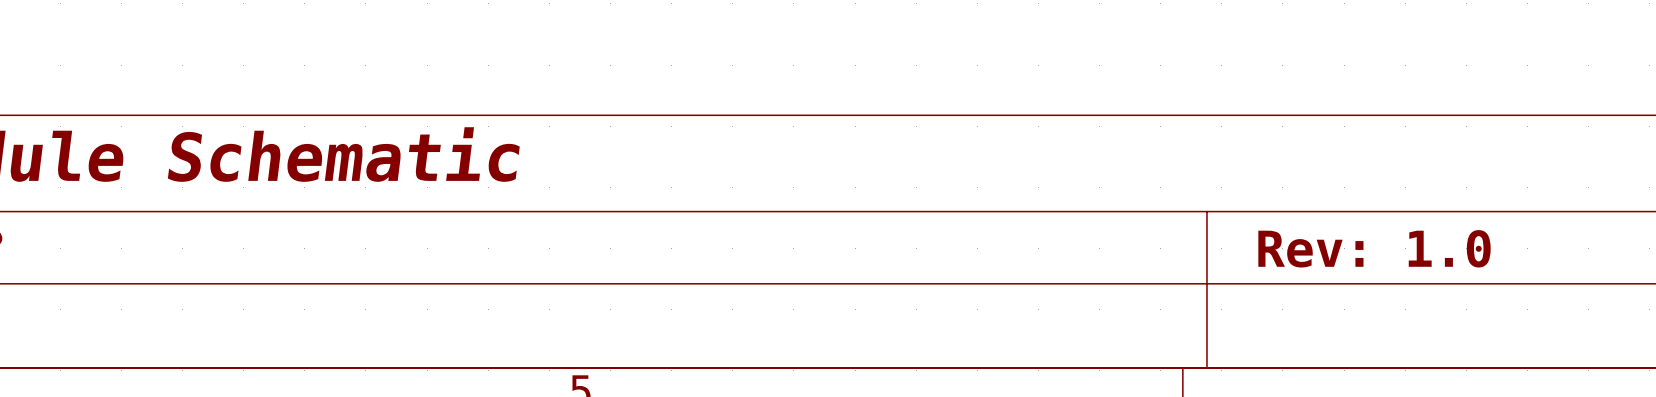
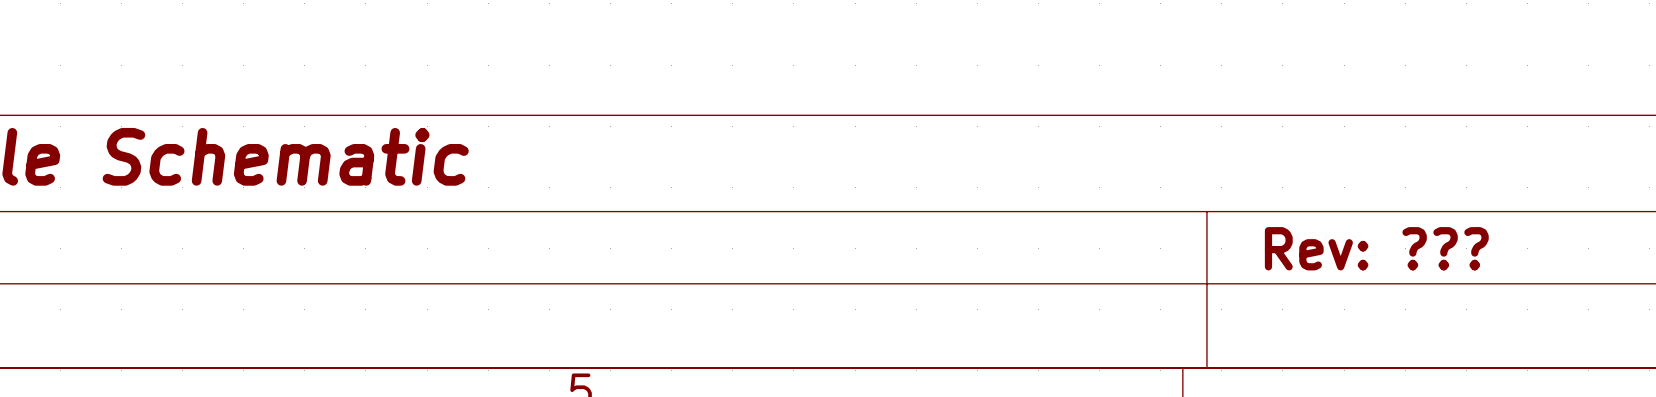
title block: Rev: 1.0 (1374, 248) -> Rev: ??? (1376, 248)

